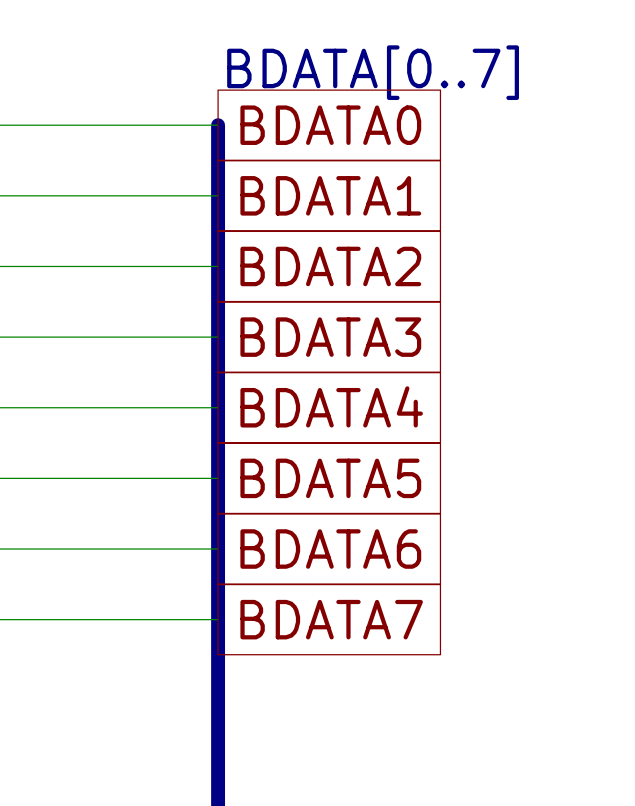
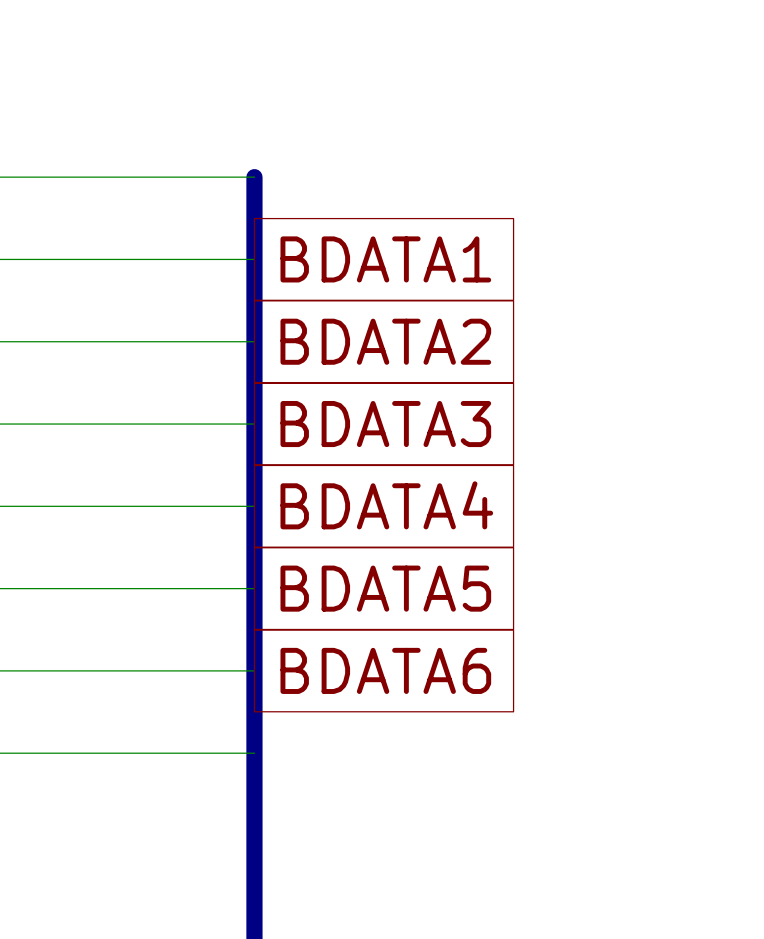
text: BDATA[0..7] (373, 72) -> none
global label: BDATA0 (330, 125) -> none
global label: BDATA7 (331, 619) -> none

